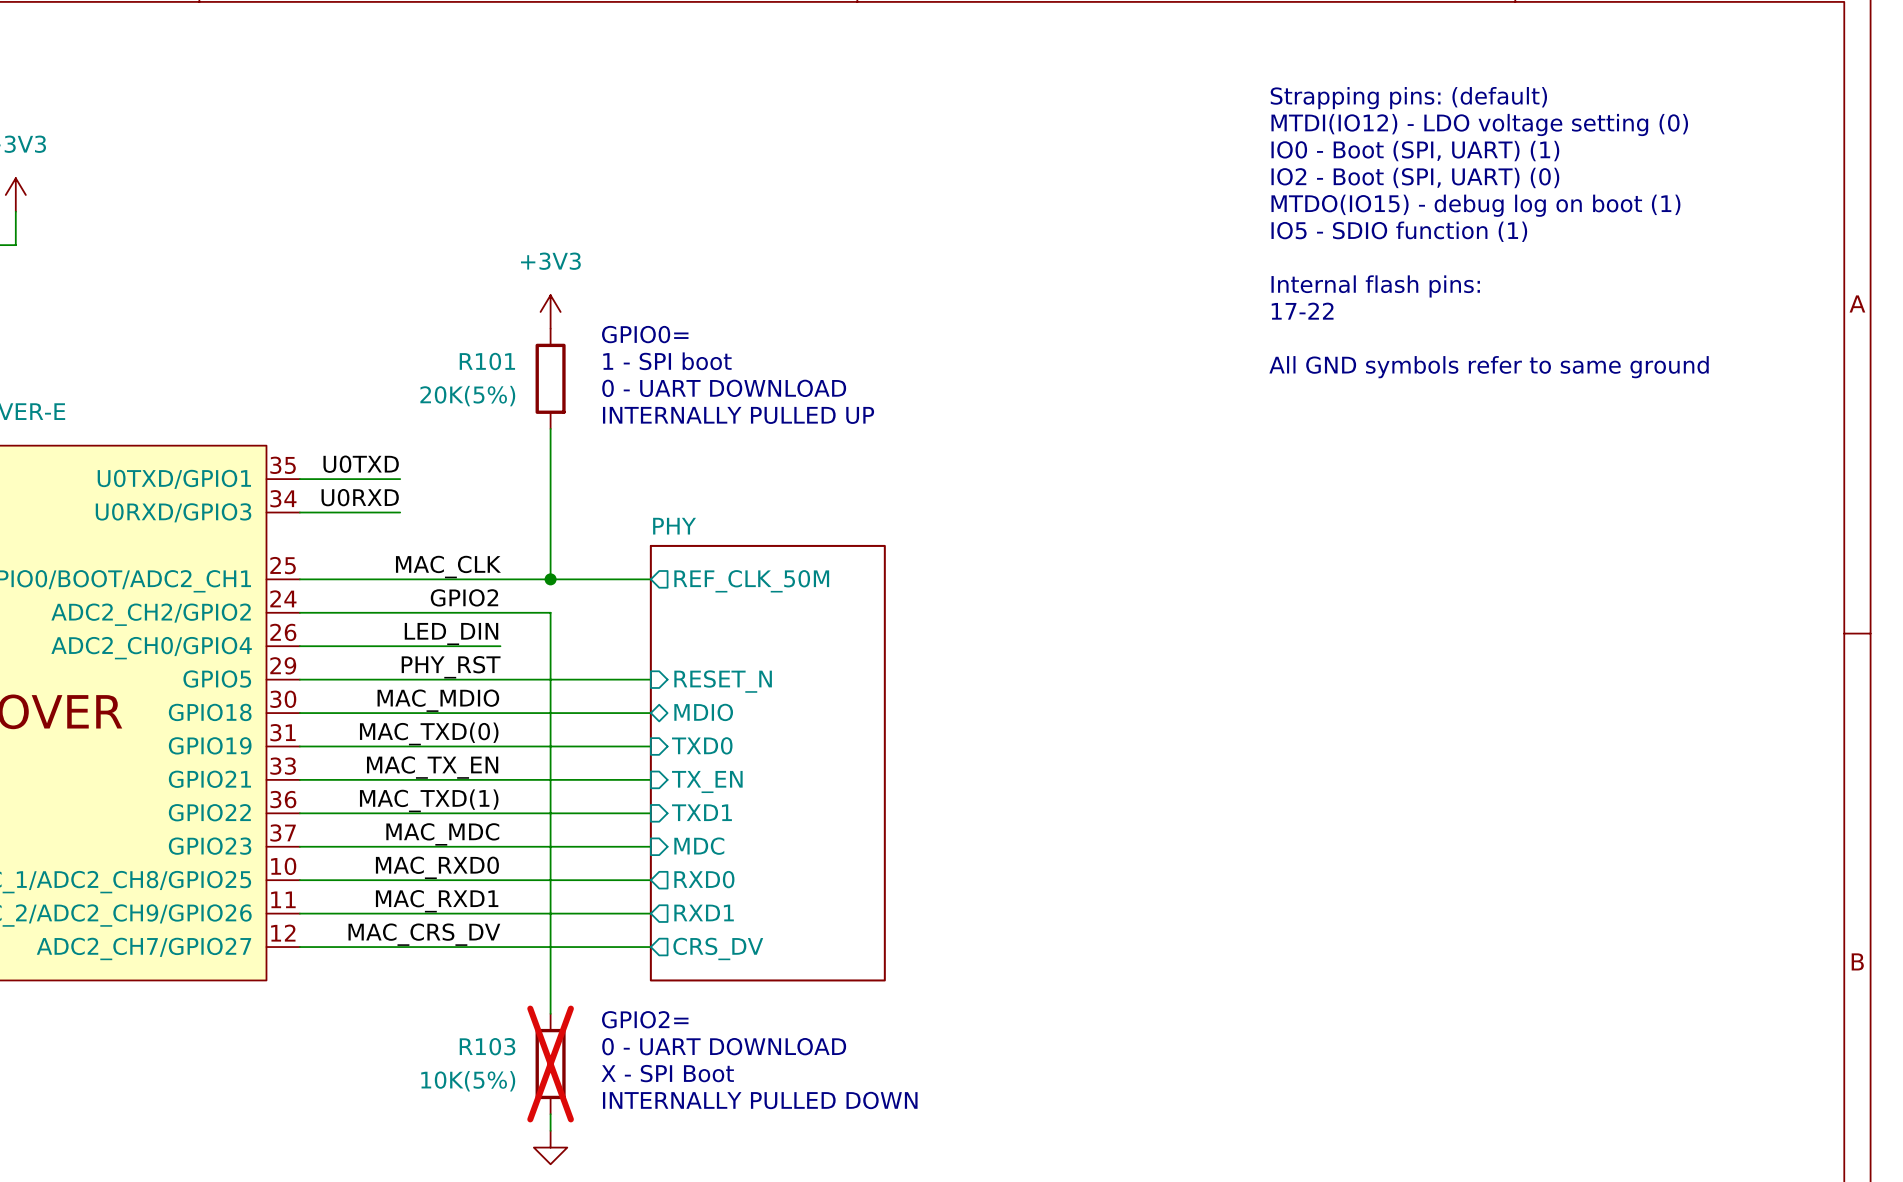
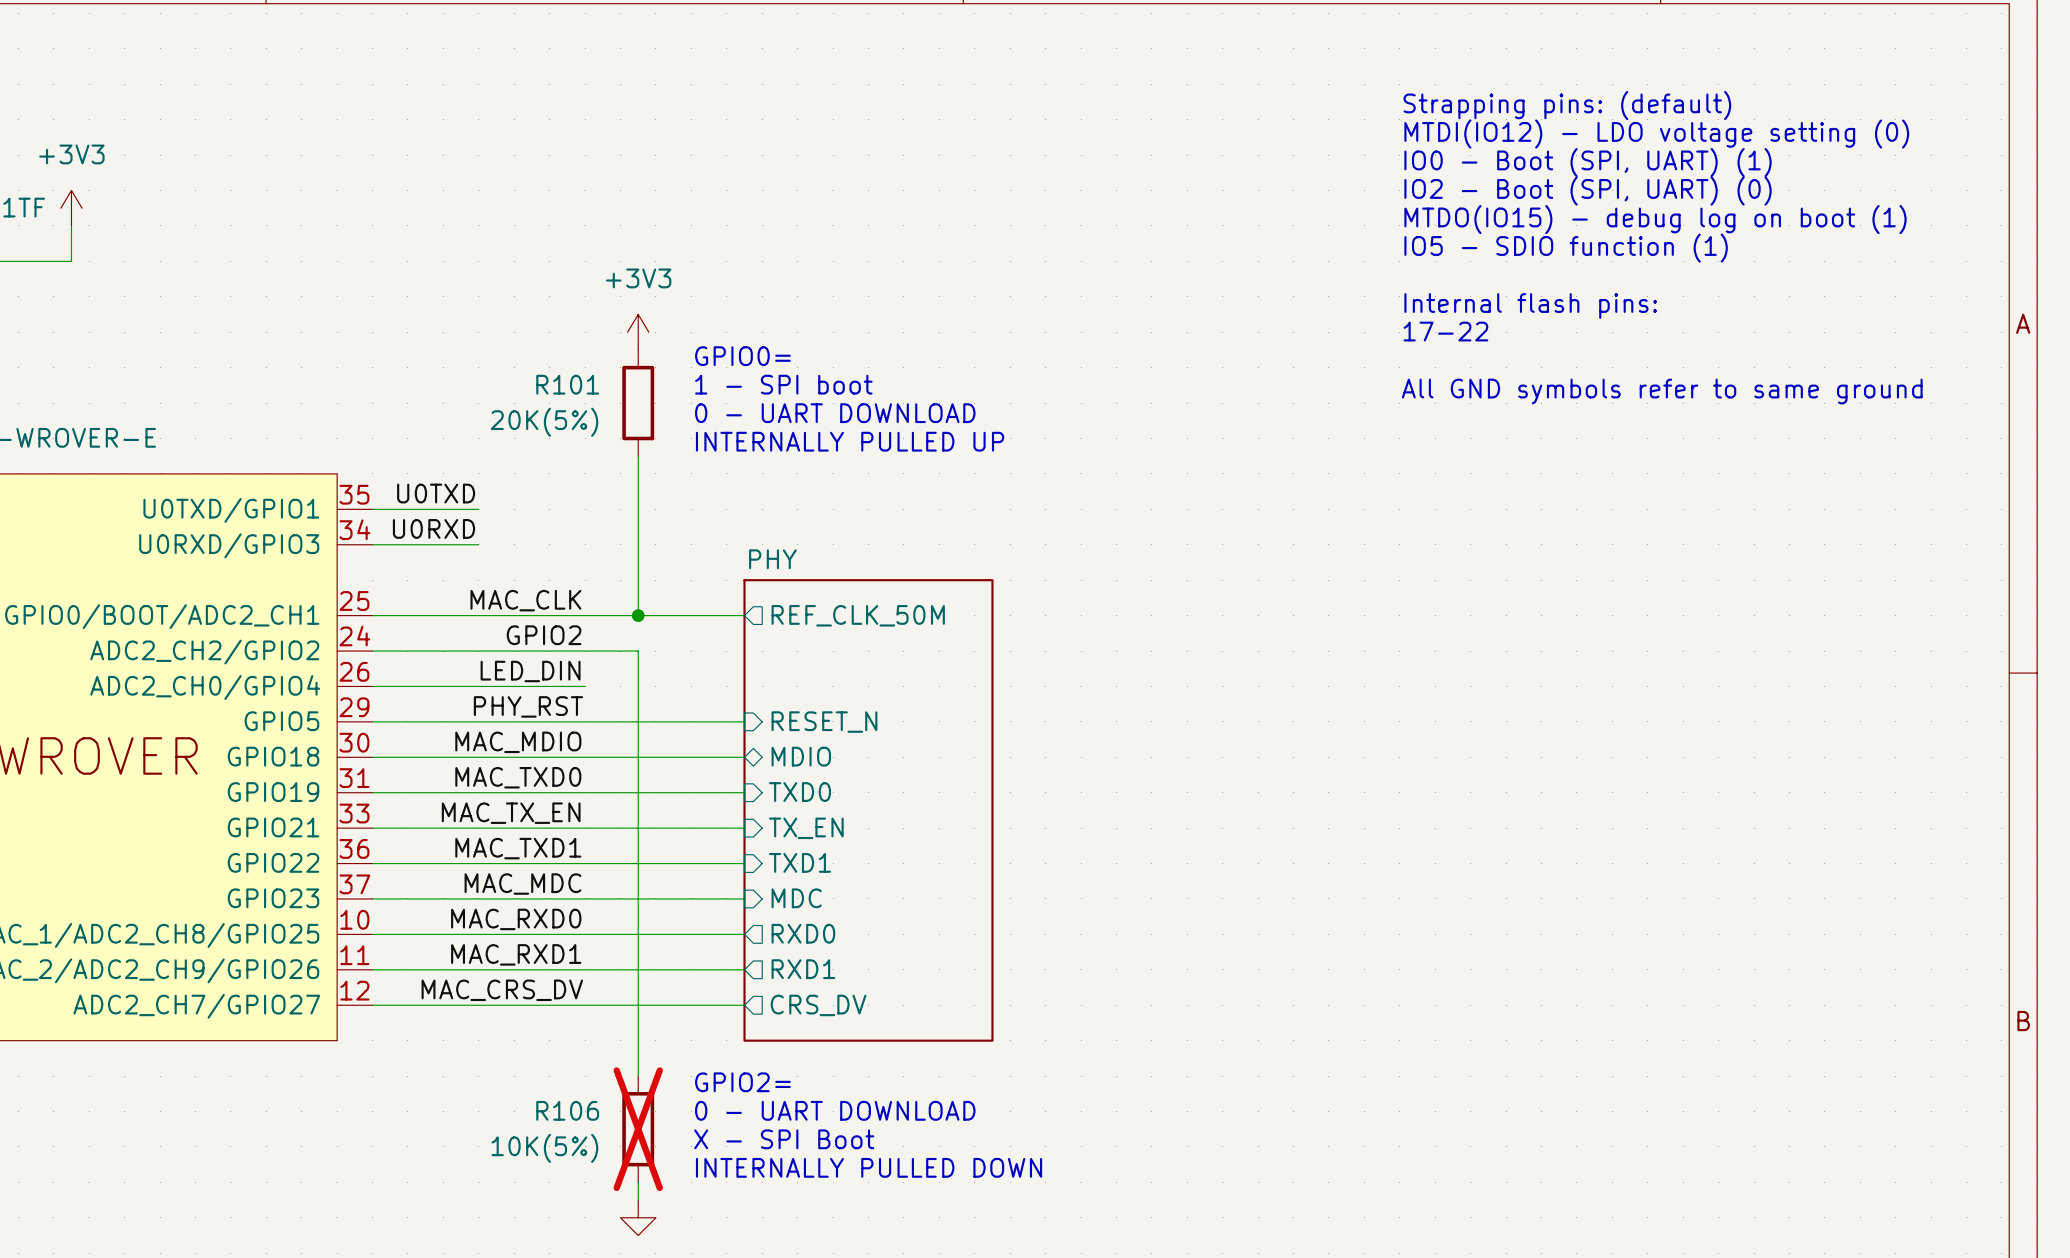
label: MAC_TXD(0) (429, 733) -> MAC_TXD0 (518, 777)
label: MAC_TXD(1) (429, 800) -> MAC_TXD1 (518, 848)
R103 name: R103 (487, 1046) -> R106 (567, 1110)

